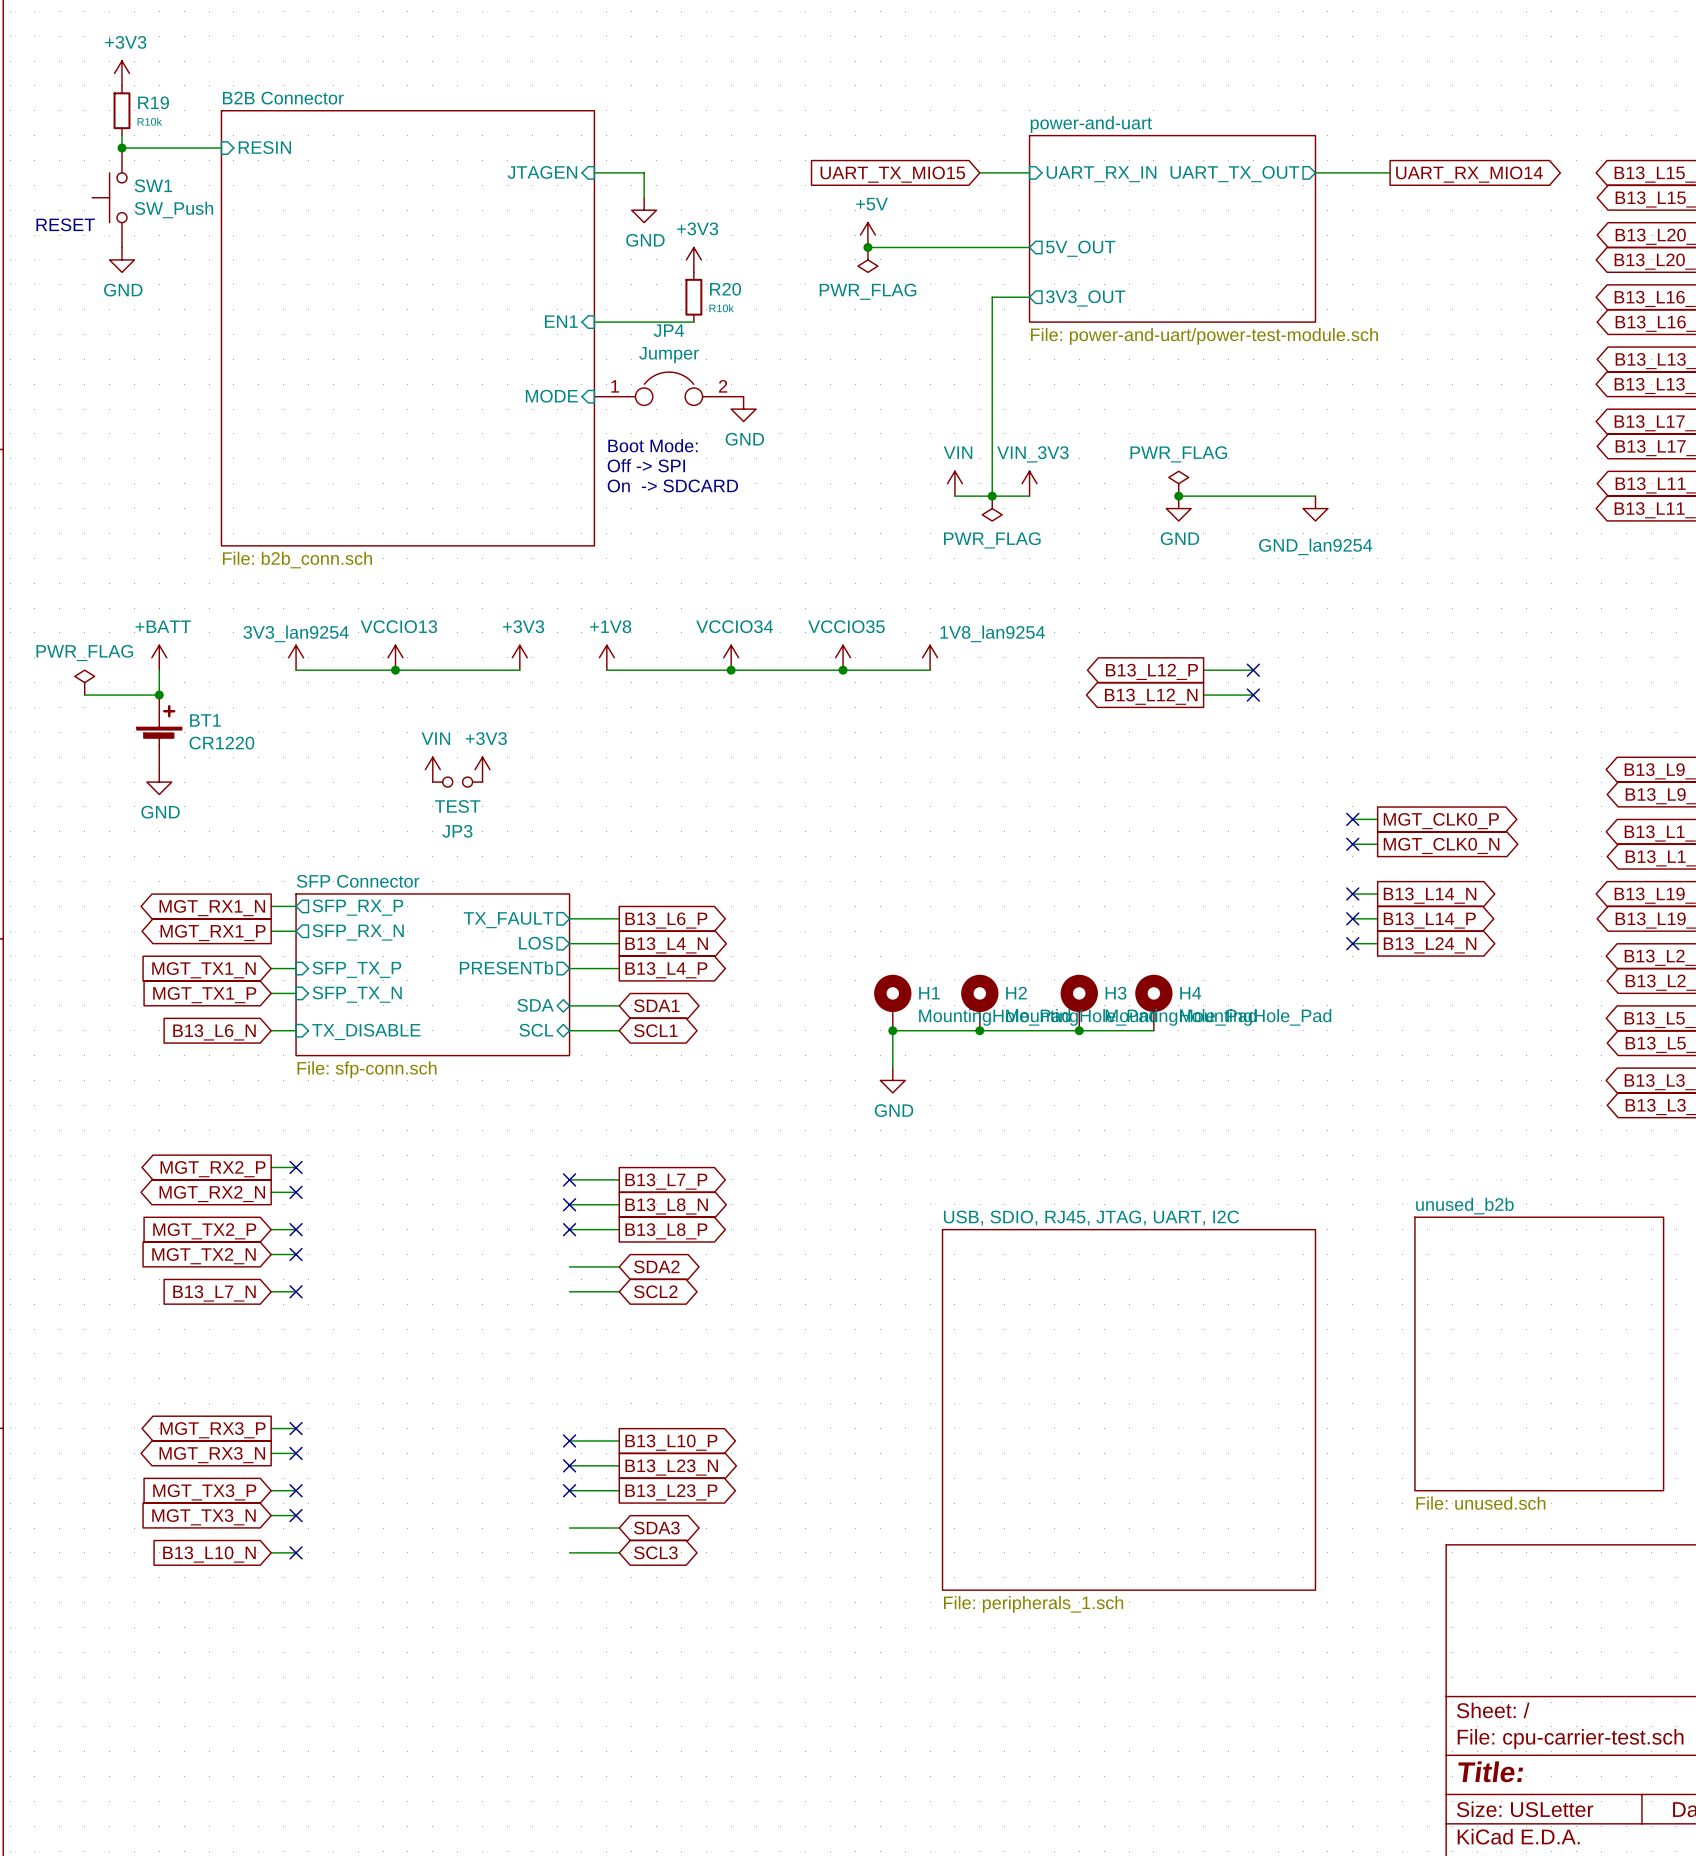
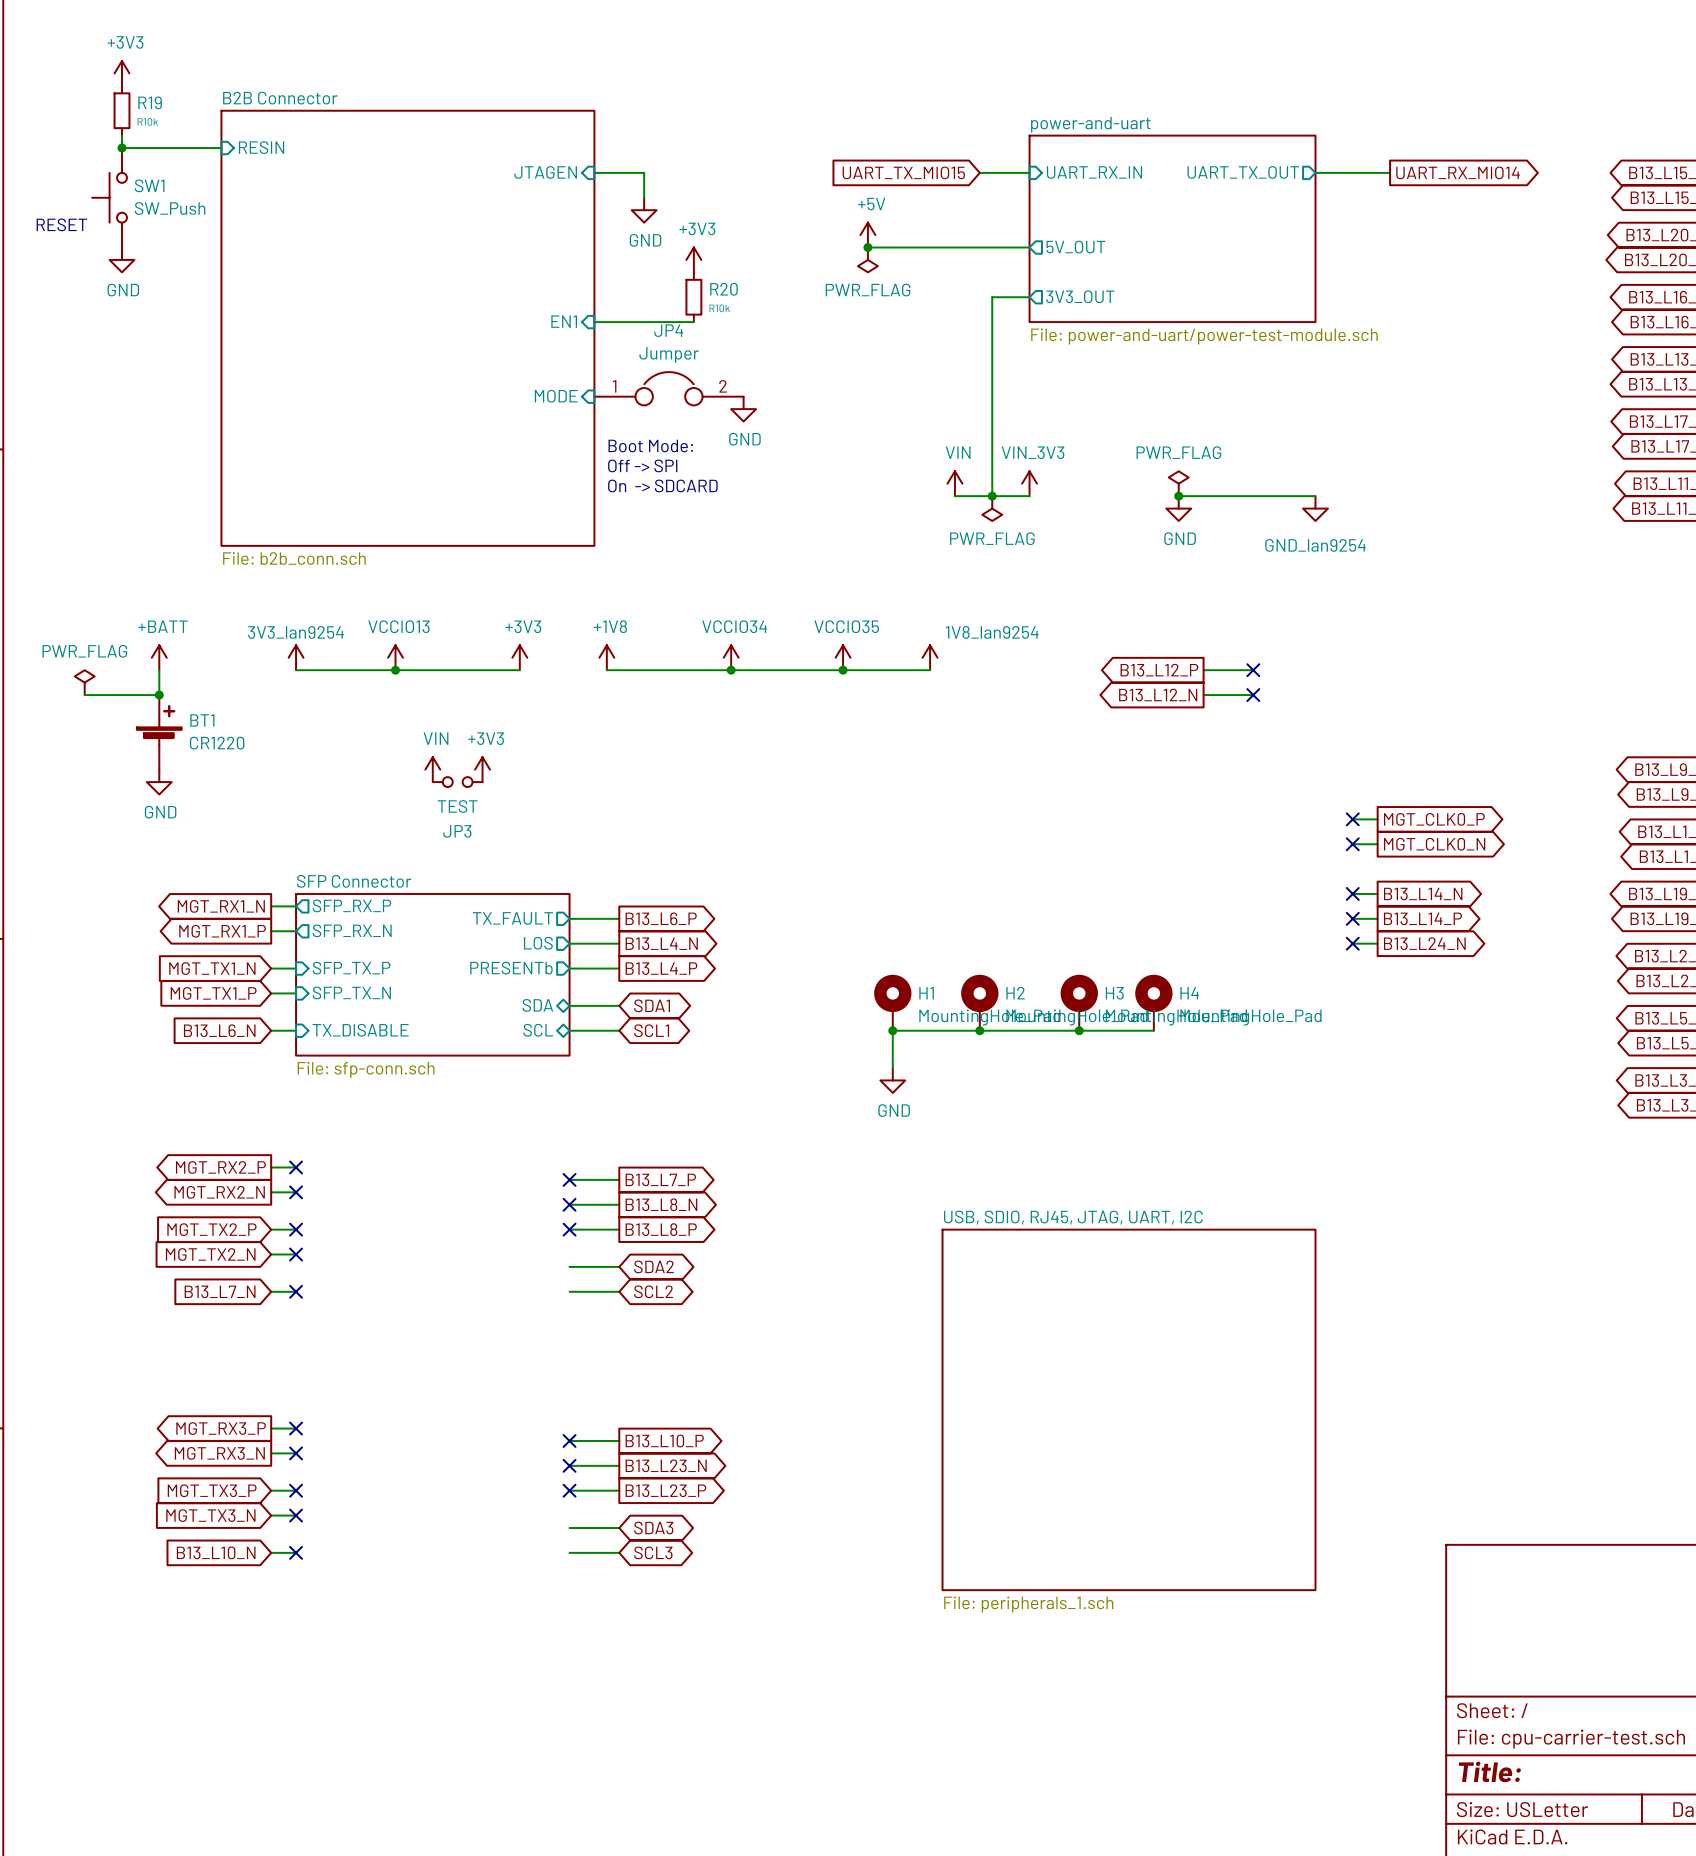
sheet unused_b2b: File: unused.sch (1539, 1353) -> none

